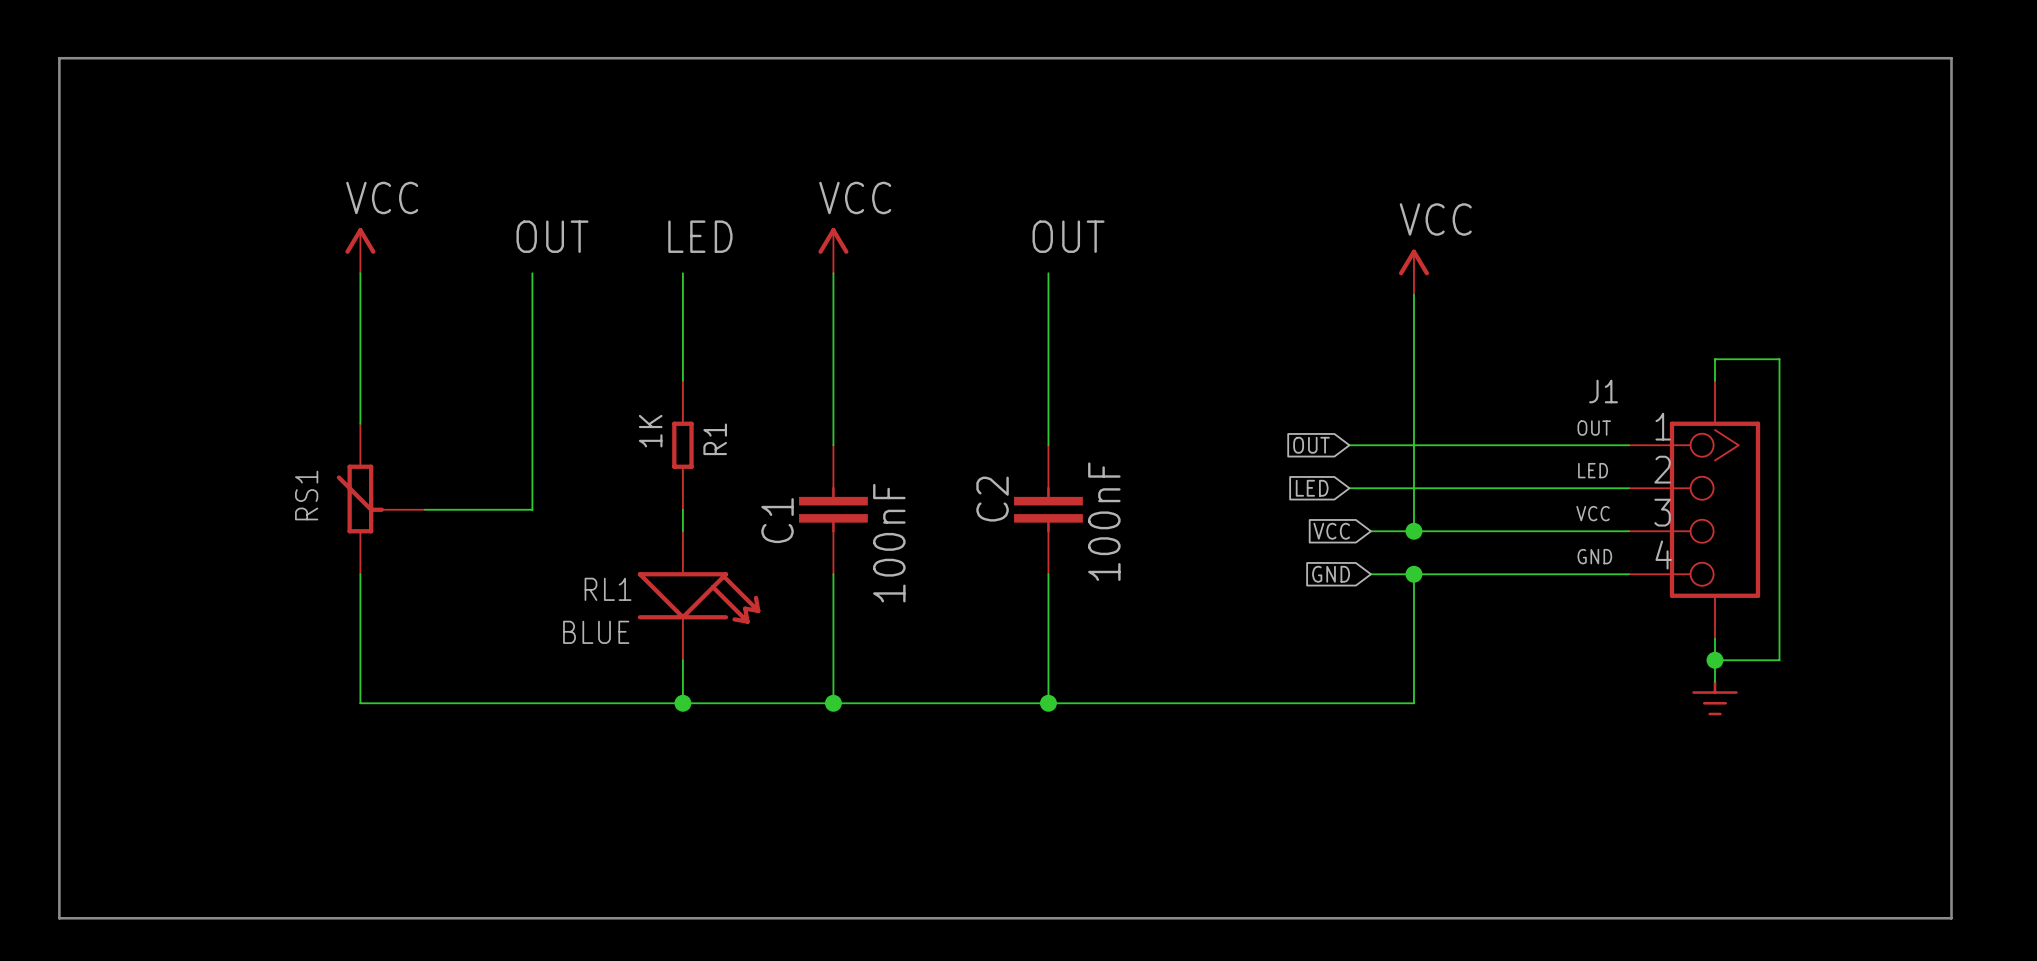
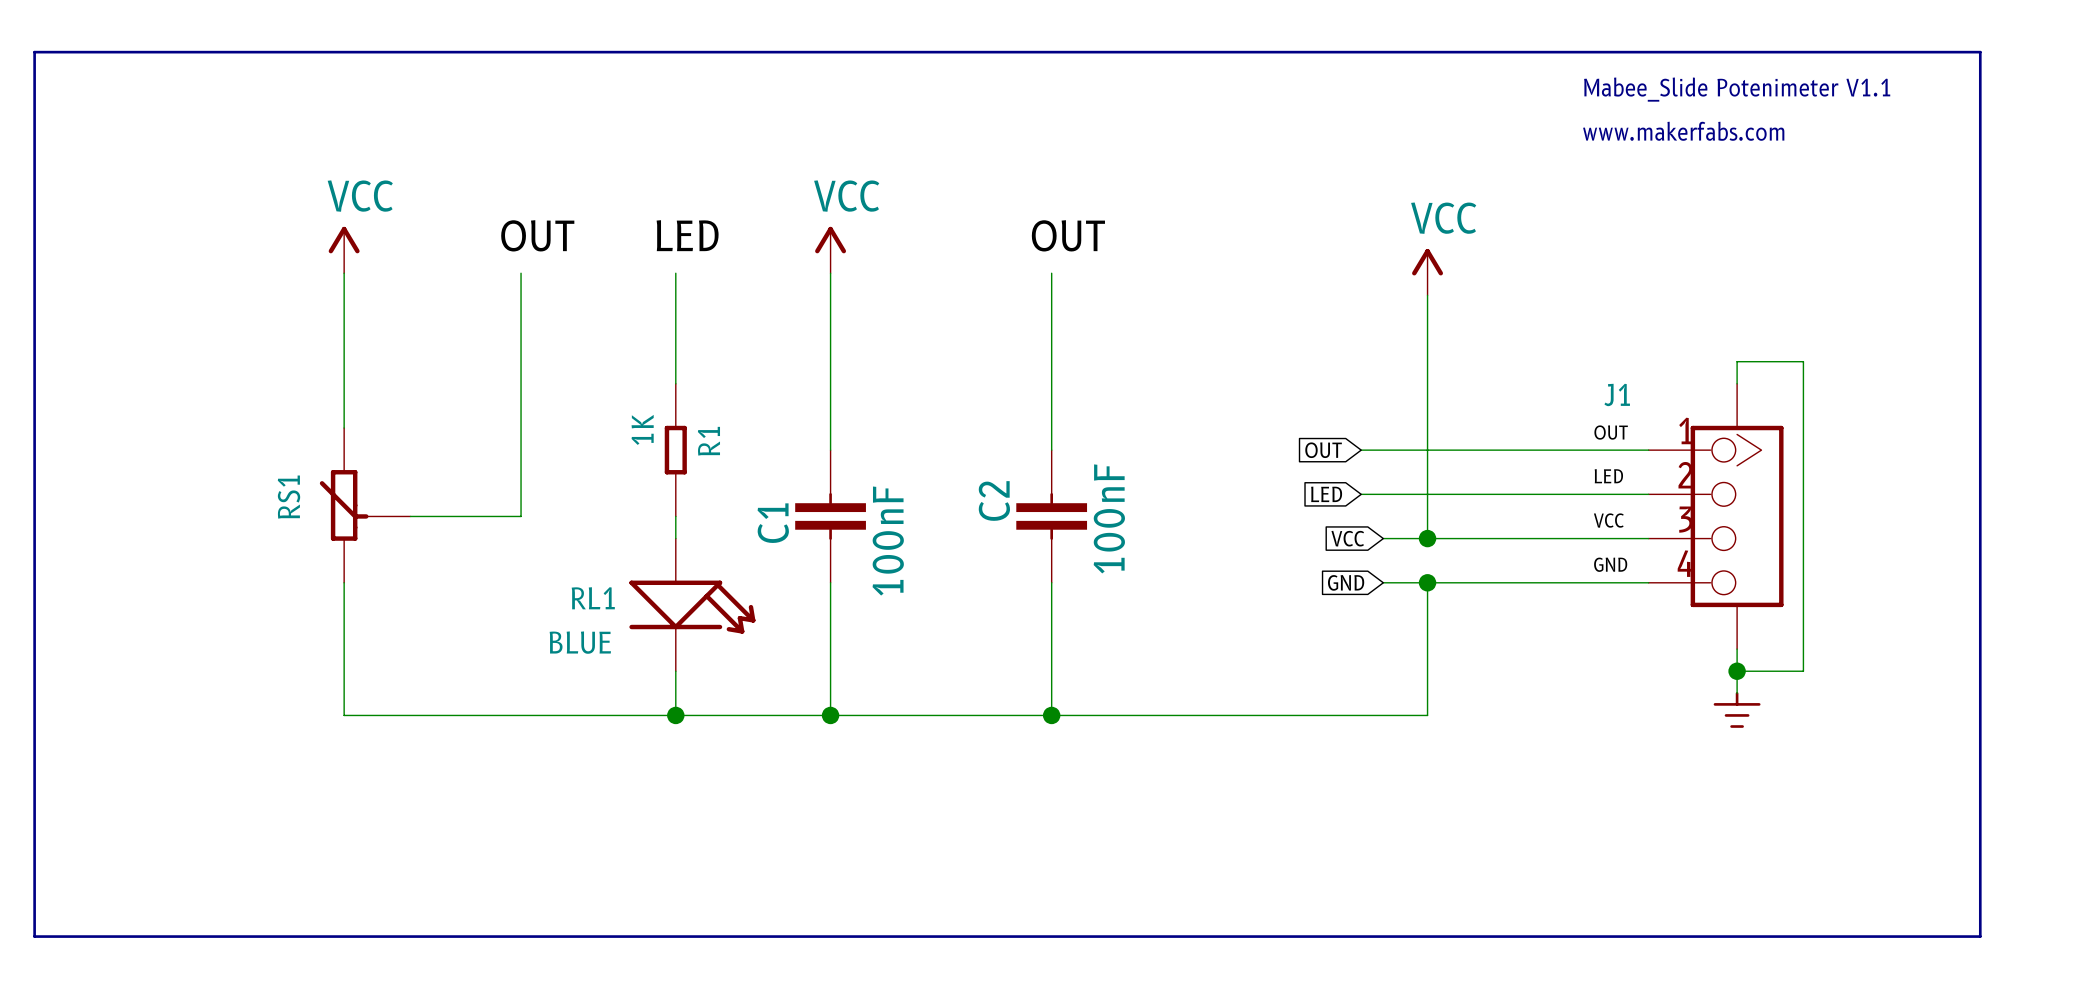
text: none -> Mabee_Slide Potenimeter V1.1 (1737, 89)
text: none -> www.makerfabs.com (1683, 131)

